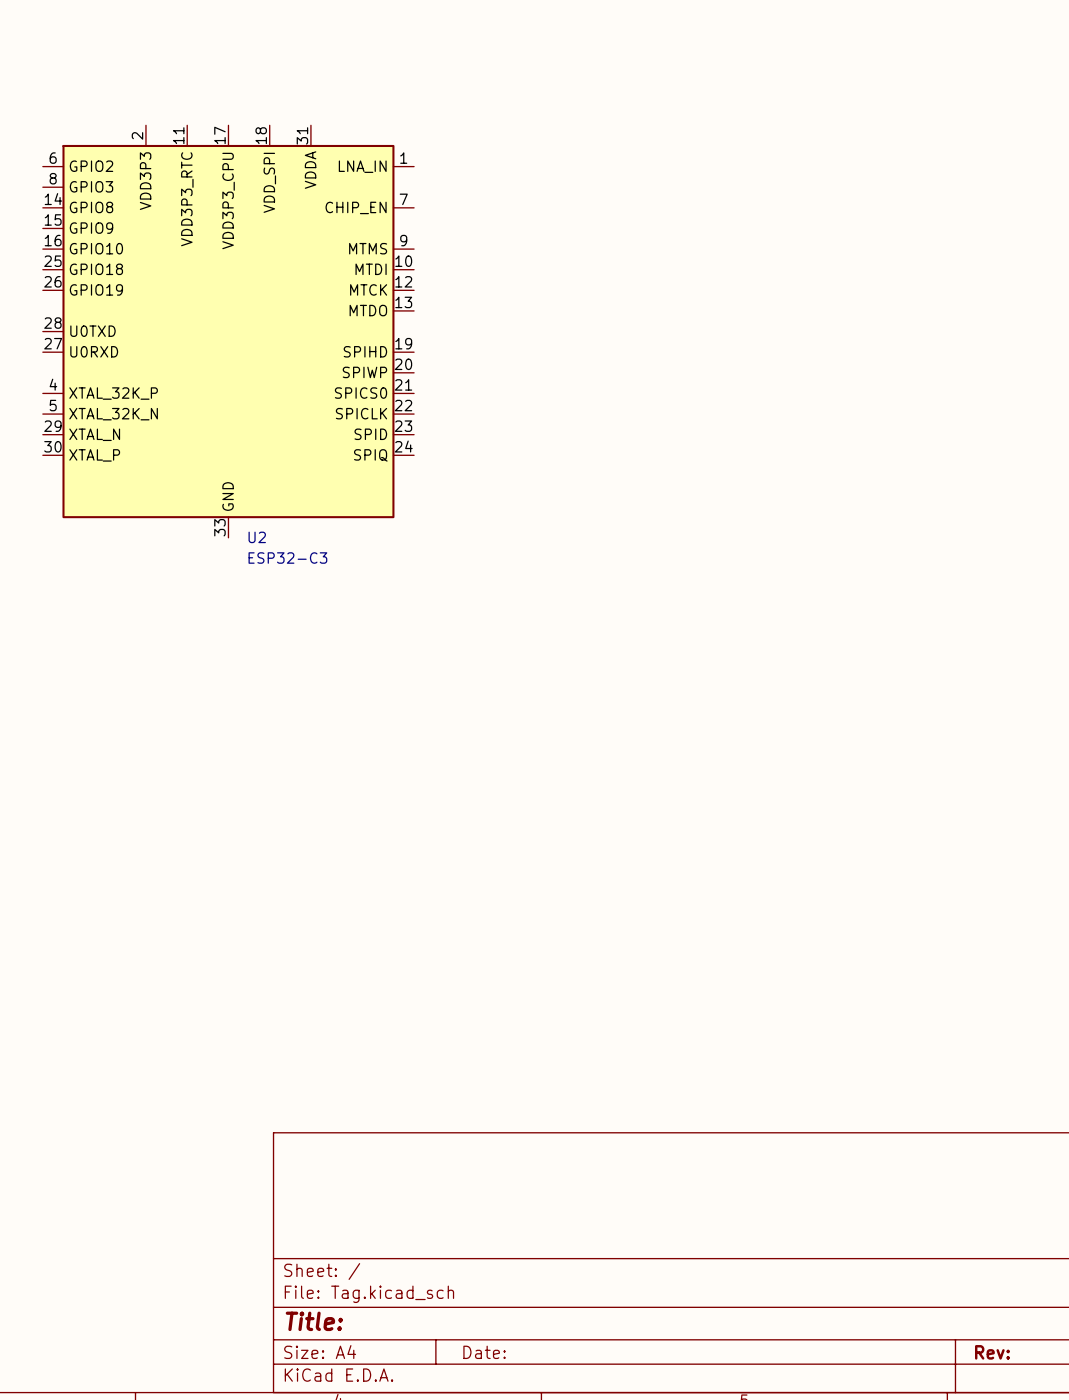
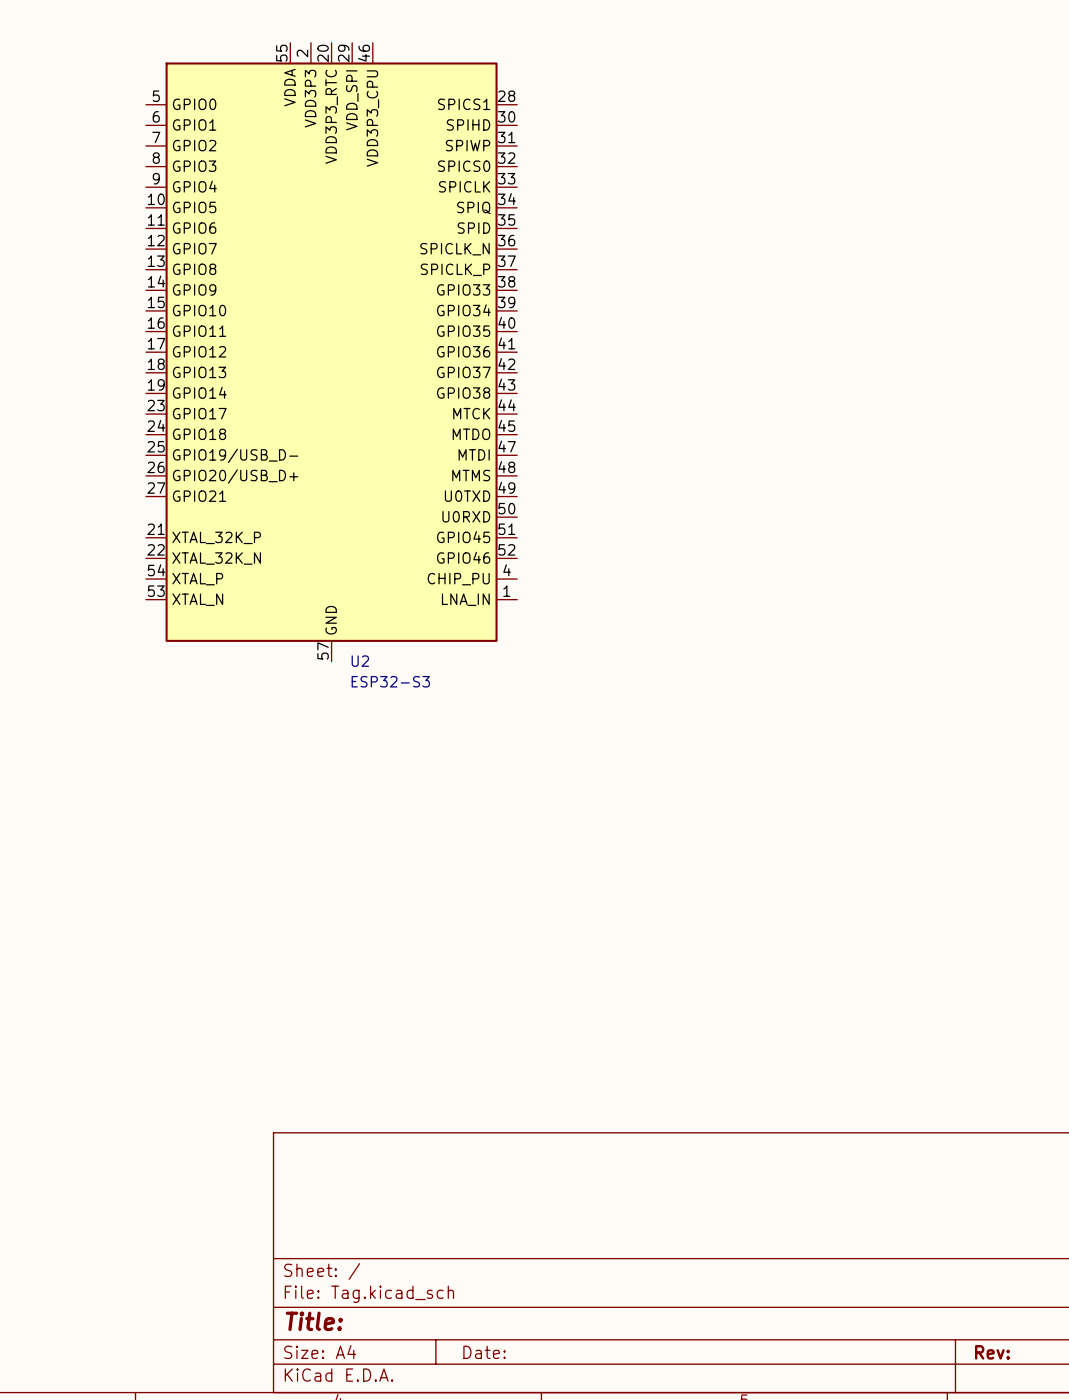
U2 symbol: [42, 125, 415, 538] -> [145, 42, 518, 662]
U2 name position: U2 (257, 537) -> U2 (360, 661)
U2 value: ESP32-C3 (287, 558) -> ESP32-S3 (390, 681)

